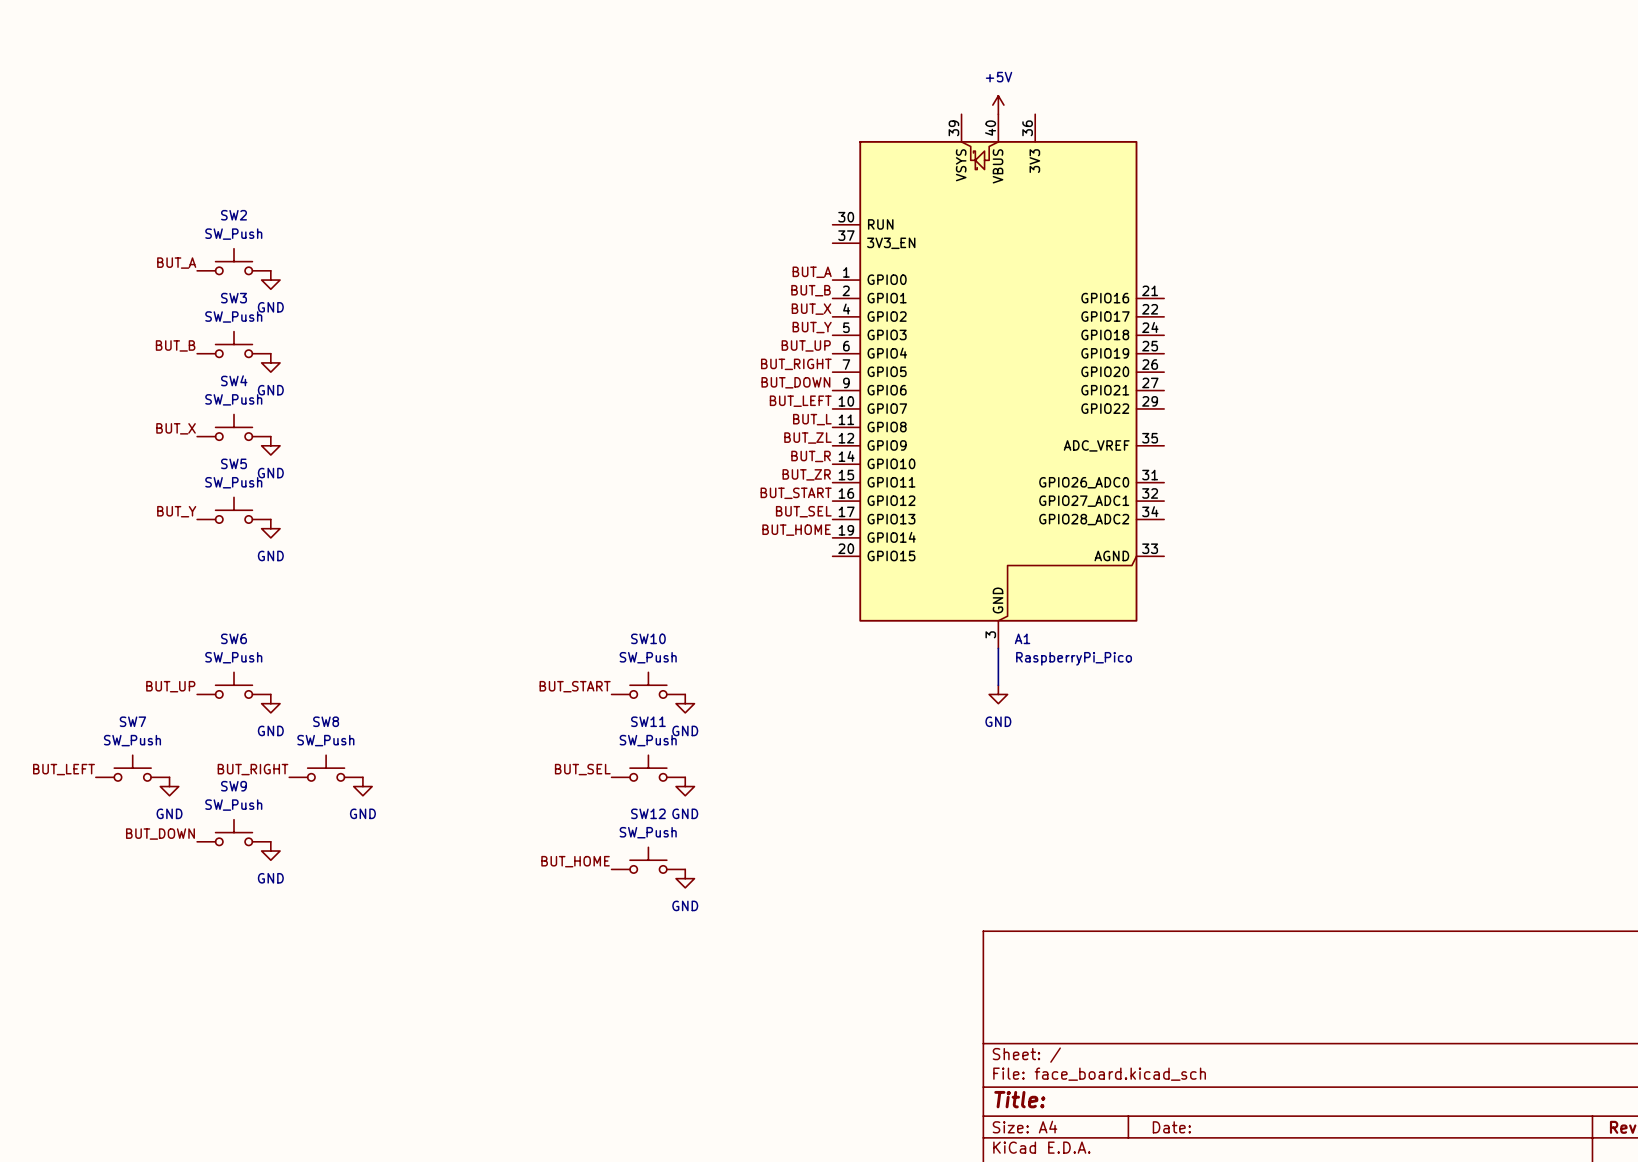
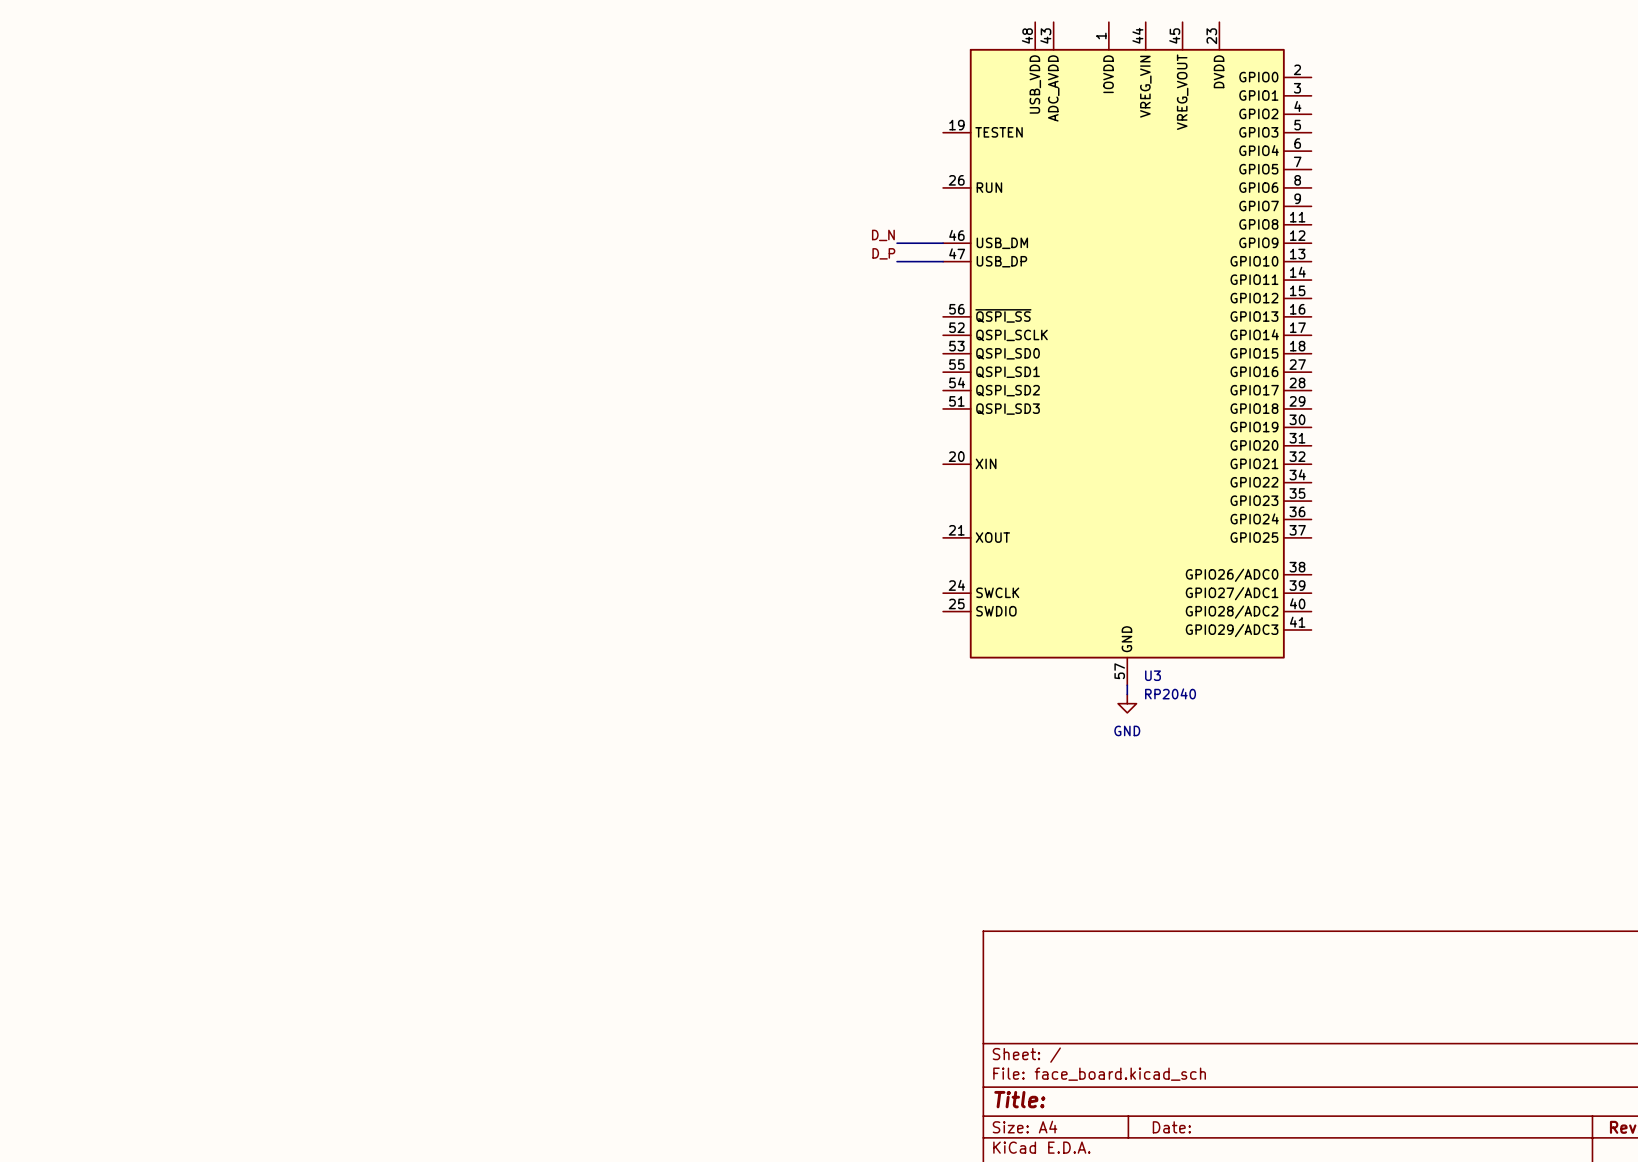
power symbol: +5V (998, 105) -> none
label: none -> D_N (883, 235)
label: none -> D_P (883, 253)
SW2: SW_Push (234, 261) -> none
label: BUT_A (176, 263) -> none
label: BUT_A (812, 272) -> none
power symbol: GND (270, 280) -> none
label: BUT_B (811, 290) -> none
label: BUT_X (811, 309) -> none
label: BUT_Y (812, 327) -> none
SW3: SW_Push (234, 344) -> none
label: BUT_B (175, 345) -> none
label: BUT_UP (806, 345) -> none
U3: none -> RP2040 (1127, 353)
power symbol: GND (270, 362) -> none
label: BUT_RIGHT (796, 364) -> none
A1: RaspberryPi_Pico (998, 381) -> none
label: BUT_DOWN (795, 382) -> none
label: BUT_LEFT (800, 401) -> none
label: BUT_L (812, 419) -> none
SW4: SW_Push (234, 427) -> none
label: BUT_X (176, 428) -> none
label: BUT_ZL (807, 438) -> none
power symbol: GND (270, 445) -> none
label: BUT_R (811, 456) -> none
label: BUT_ZR (806, 474) -> none
label: BUT_START (796, 493) -> none
SW5: SW_Push (234, 510) -> none
label: BUT_Y (176, 511) -> none
label: BUT_SEL (803, 511) -> none
power symbol: GND (270, 528) -> none
label: BUT_HOME (796, 530) -> none
wire: (998, 648) (998, 685) -> none
SW6: SW_Push (234, 685) -> none
SW10: SW_Push (648, 685) -> none
wire: none -> (1127, 685) (1127, 694)
label: BUT_UP (170, 686) -> none
label: BUT_START (575, 686) -> none
power symbol position: GND (998, 694) -> GND (1127, 703)
power symbol: GND (270, 703) -> none
power symbol: GND (685, 703) -> none
SW7: SW_Push (132, 768) -> none
SW8: SW_Push (326, 768) -> none
SW11: SW_Push (648, 768) -> none
label: BUT_LEFT (63, 769) -> none
label: BUT_RIGHT (253, 769) -> none
label: BUT_SEL (582, 769) -> none
power symbol: GND (169, 786) -> none
power symbol: GND (362, 786) -> none
power symbol: GND (685, 786) -> none
SW9: SW_Push (234, 832) -> none
label: BUT_DOWN (160, 834) -> none
power symbol: GND (270, 851) -> none
SW12: SW_Push (648, 860) -> none
label: BUT_HOME (575, 861) -> none
power symbol: GND (685, 878) -> none

